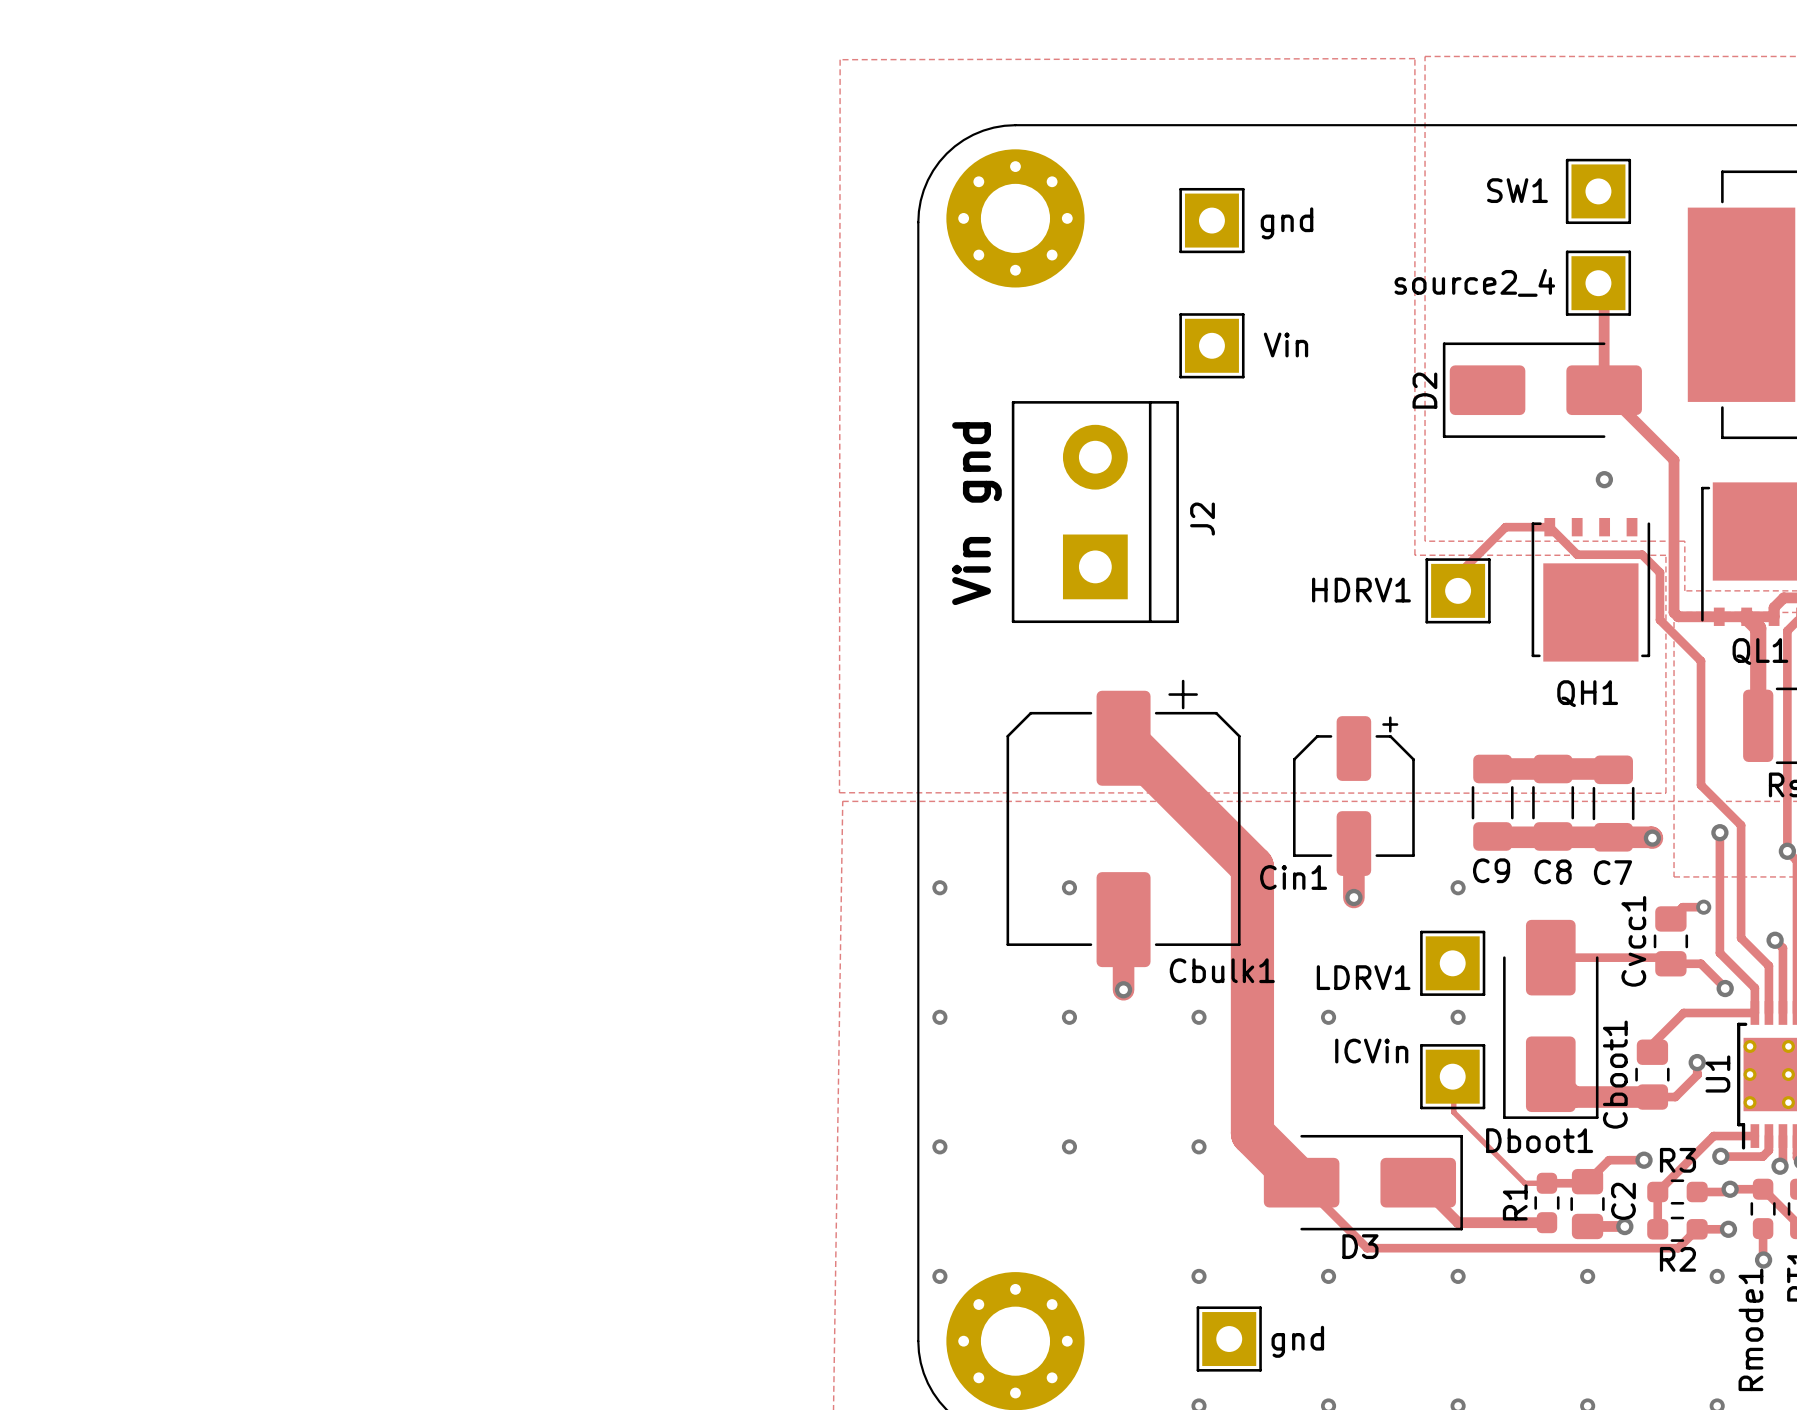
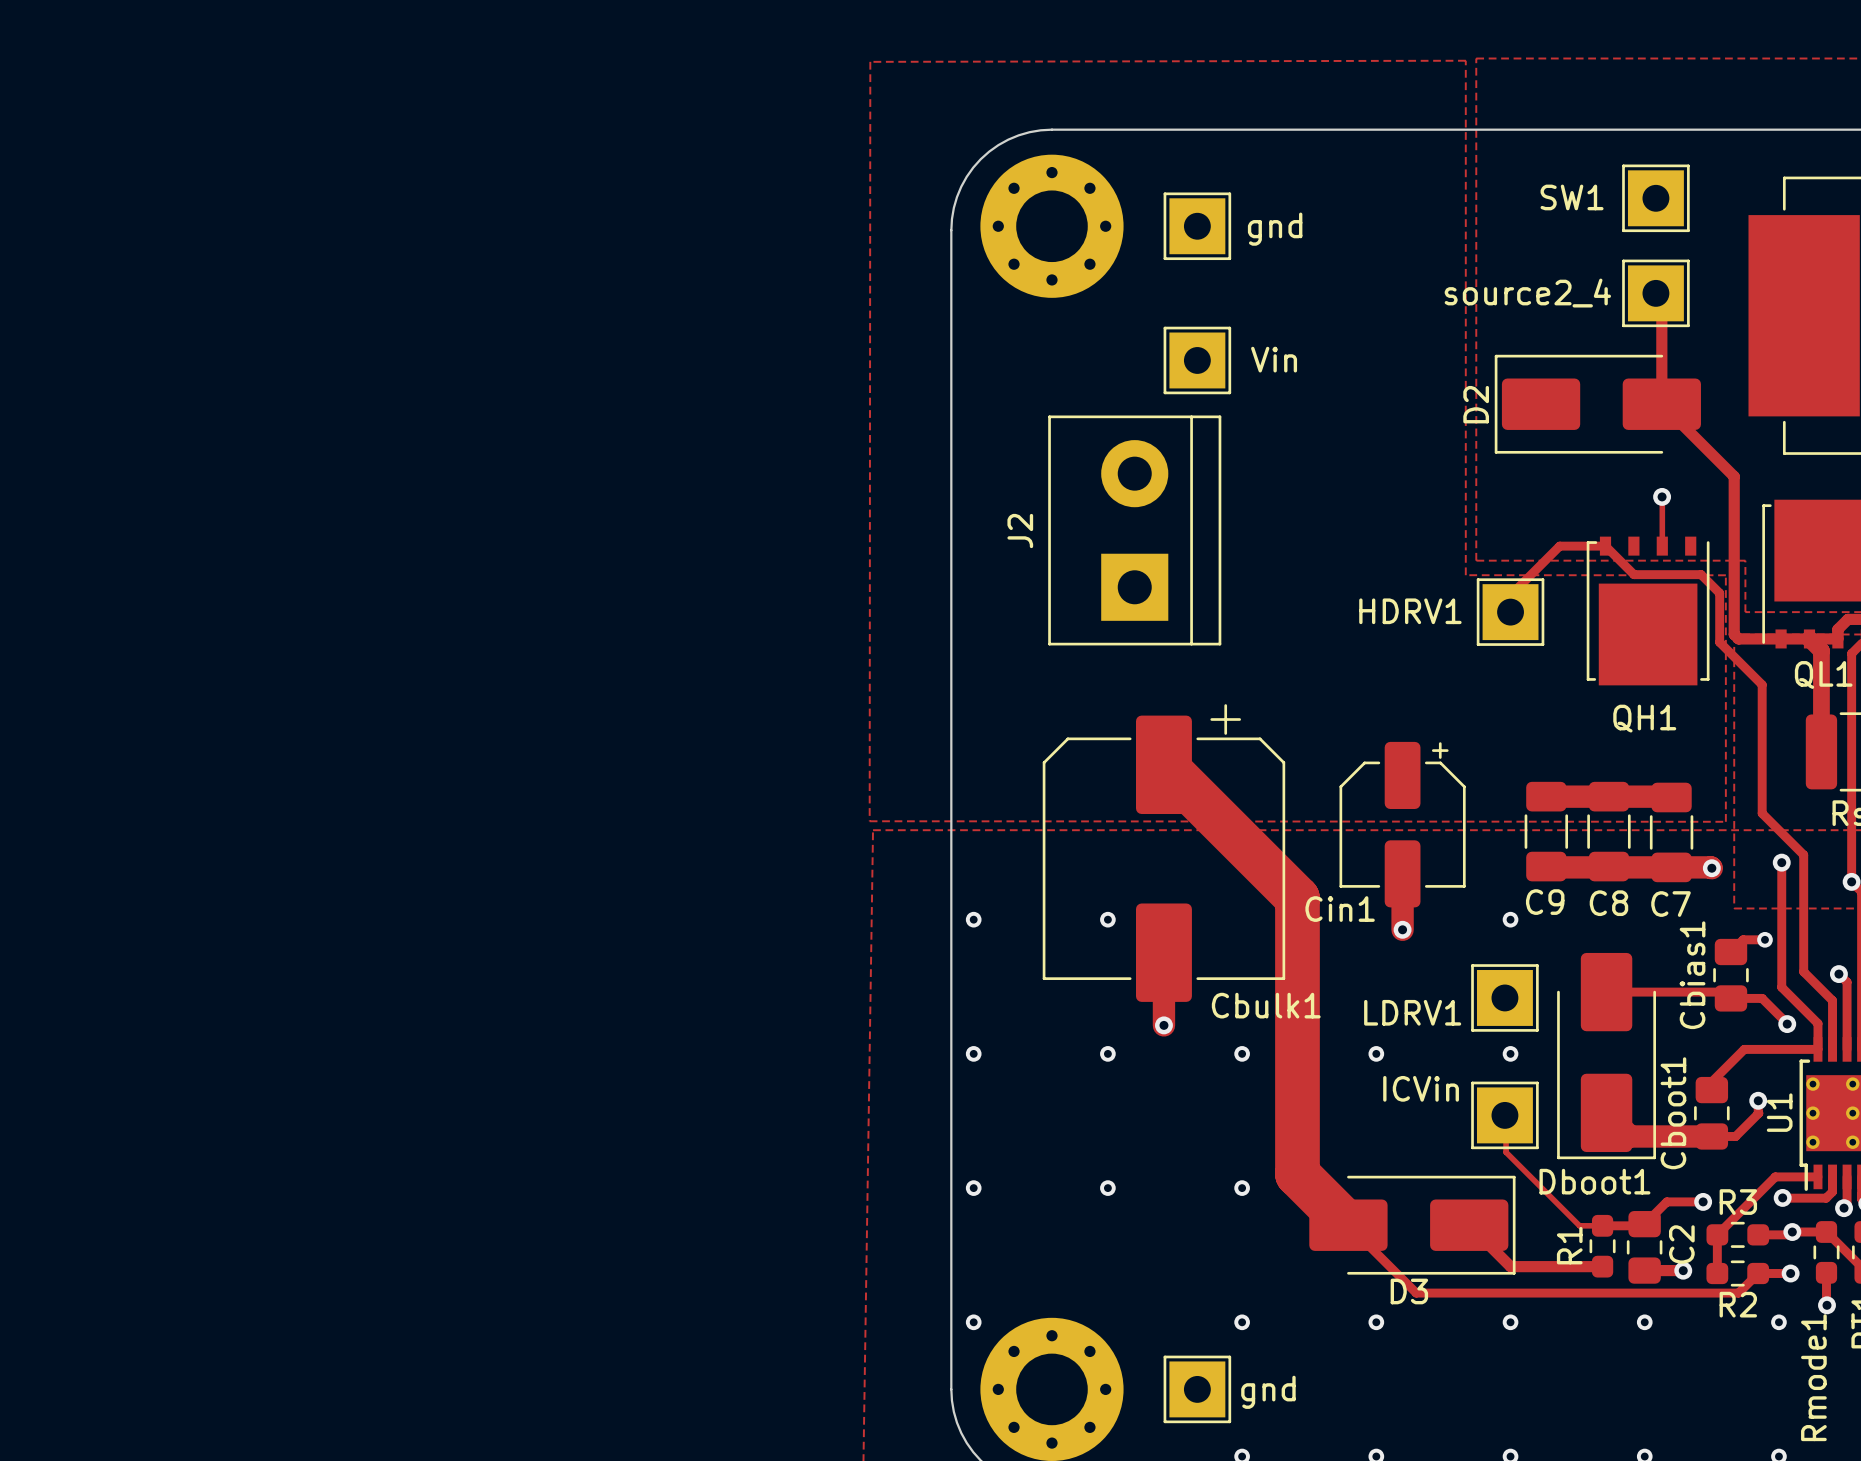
part position: (1211, 220) -> (1197, 226)
part position: (1211, 345) -> (1197, 360)
text: gnd (976, 462) -> none
track: none -> (1662, 497) (1662, 546)
J2 name position: J2 (1202, 519) -> J2 (1020, 531)
text: Vin (971, 571) -> none
Cvcc1 name: Cvcc1 (1633, 941) -> Cbias1 (1692, 975)
part position: (1229, 1339) -> (1197, 1389)

